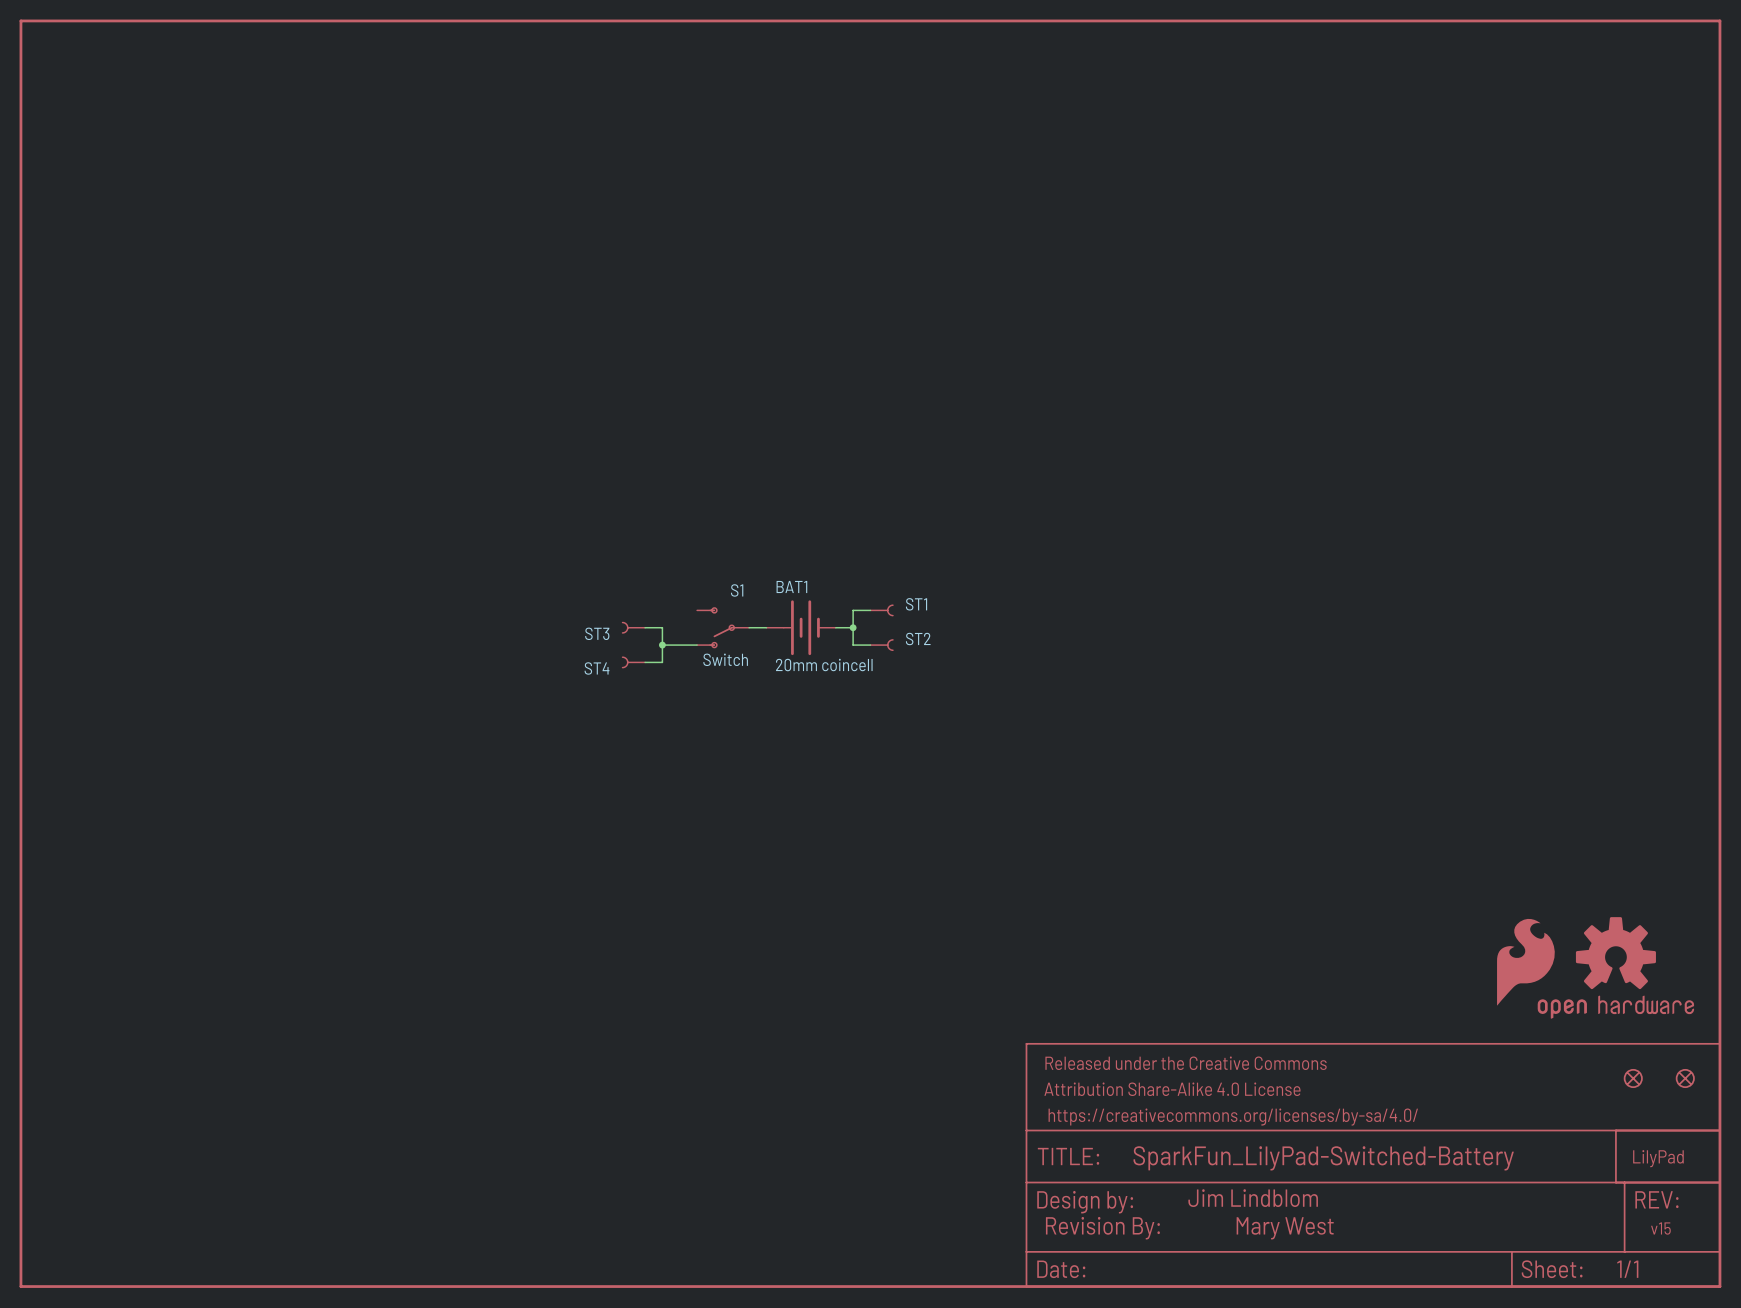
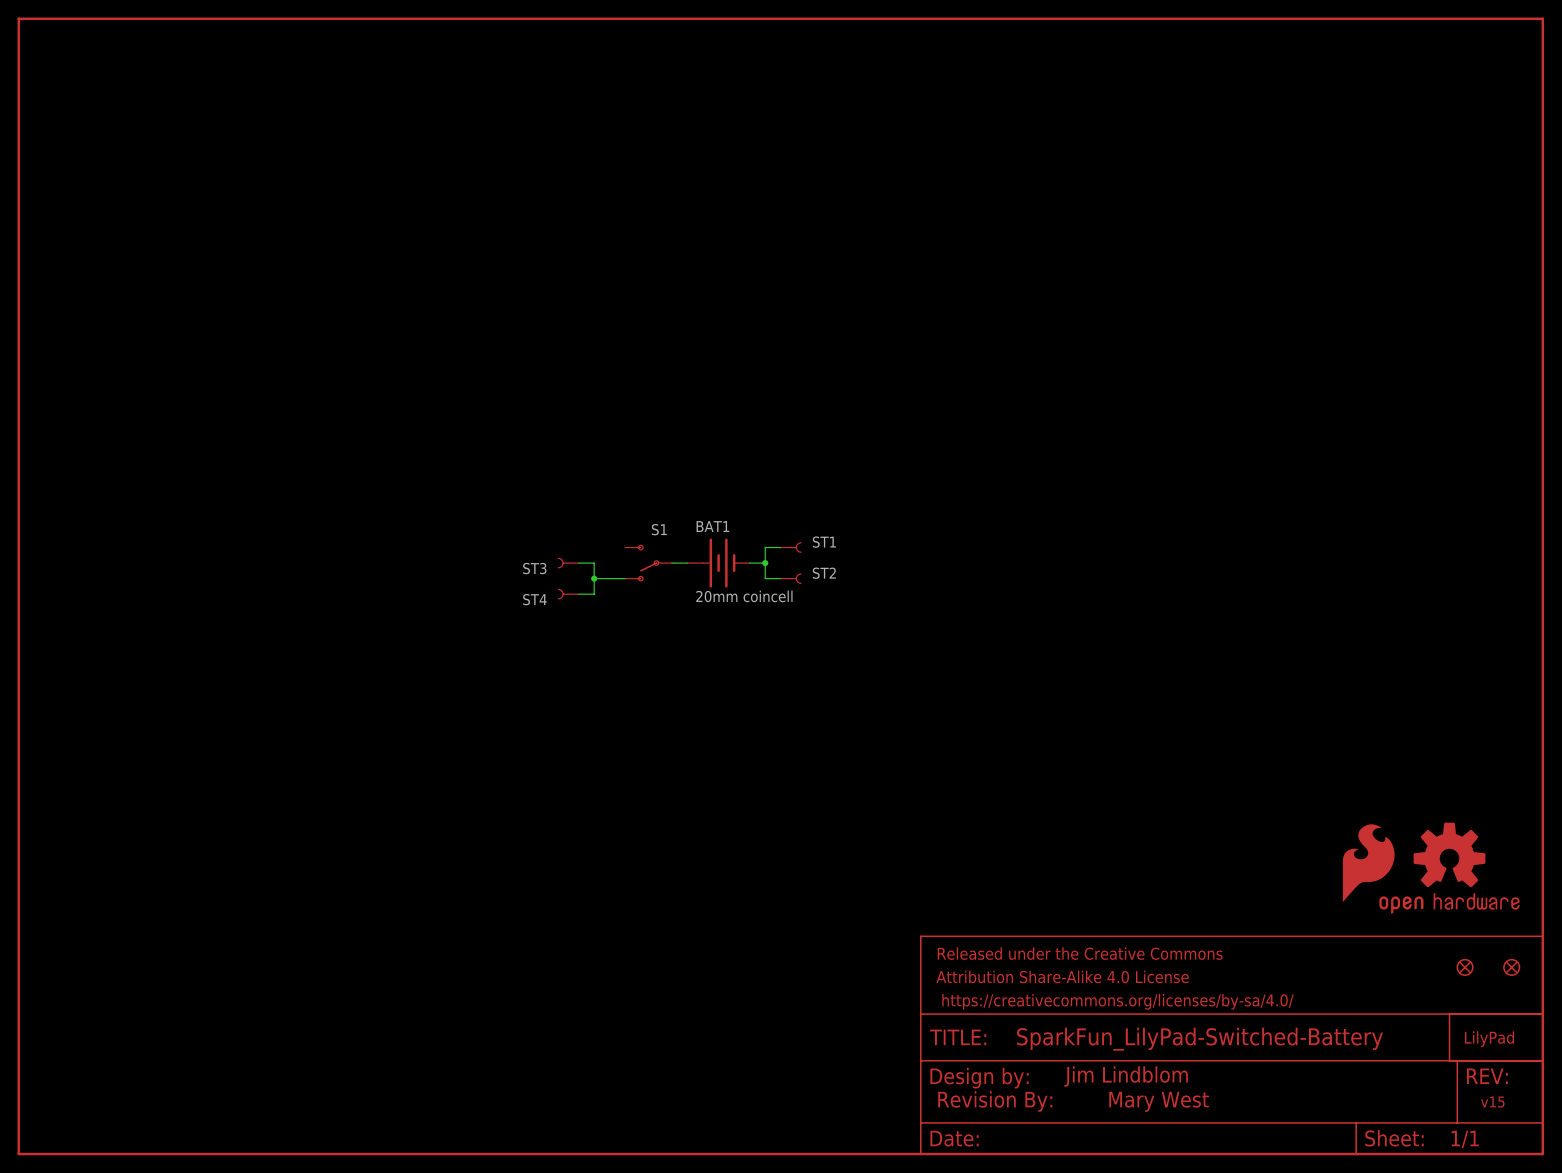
S1 value: Switch (725, 659) -> none

